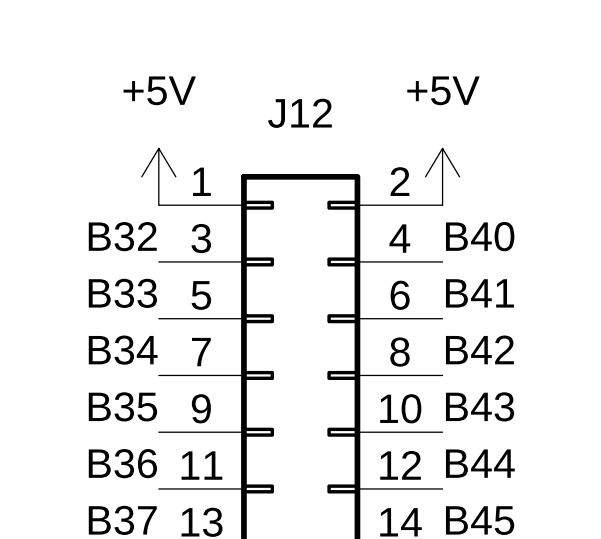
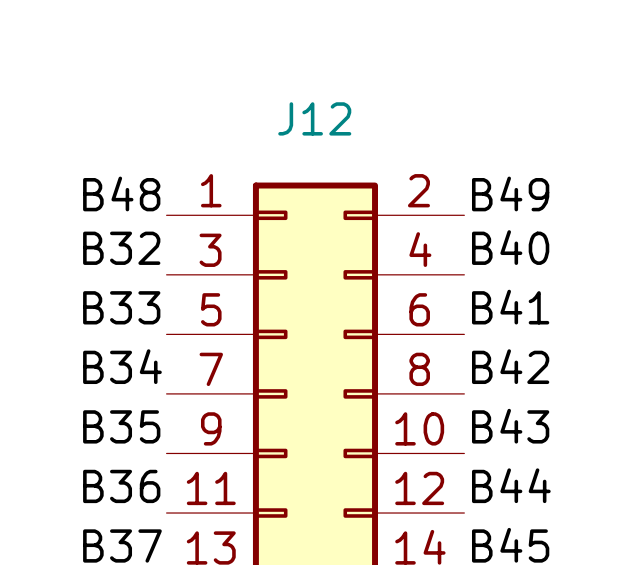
power symbol: +5V (158, 176) -> none
power symbol: +5V (442, 176) -> none
label: none -> B48 (121, 193)
label: none -> B49 (510, 193)

